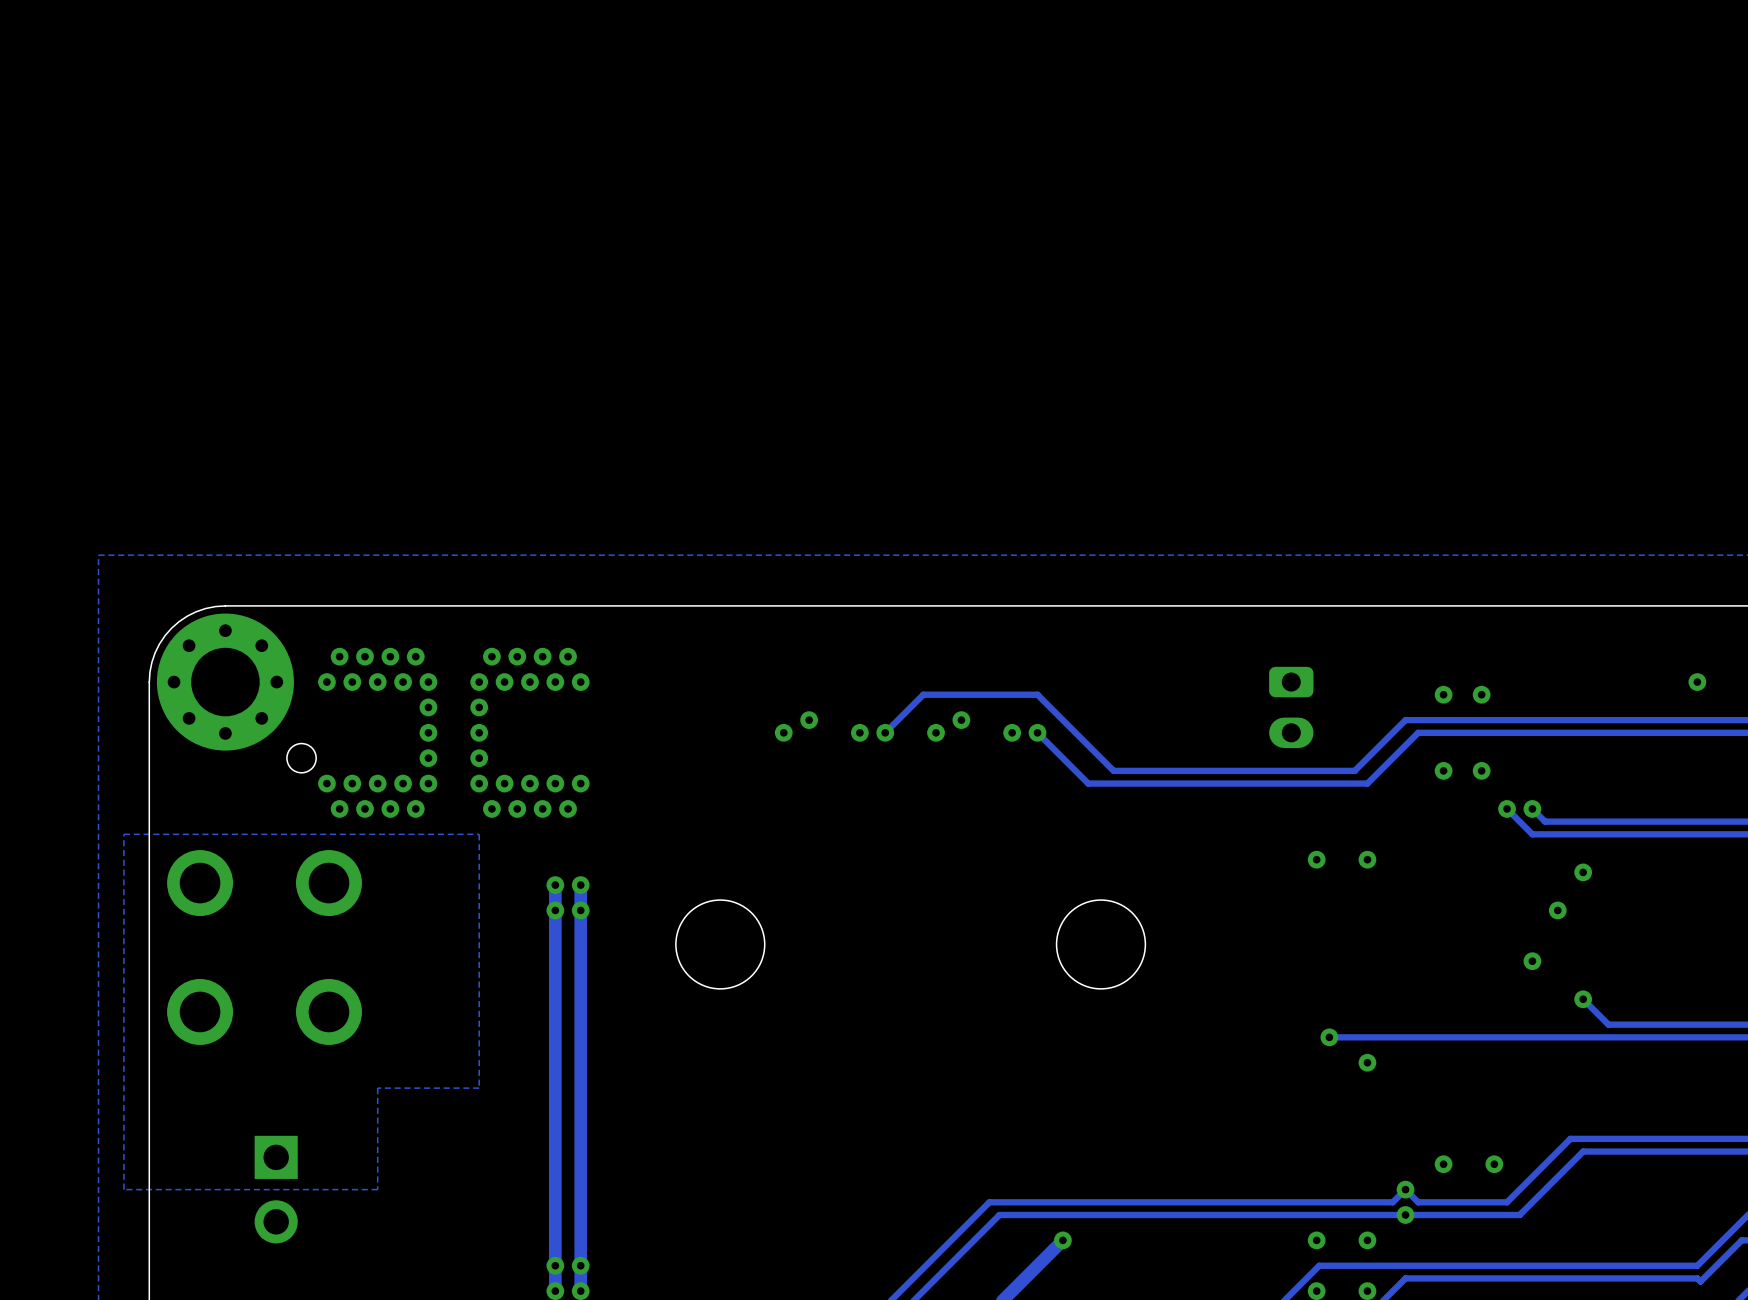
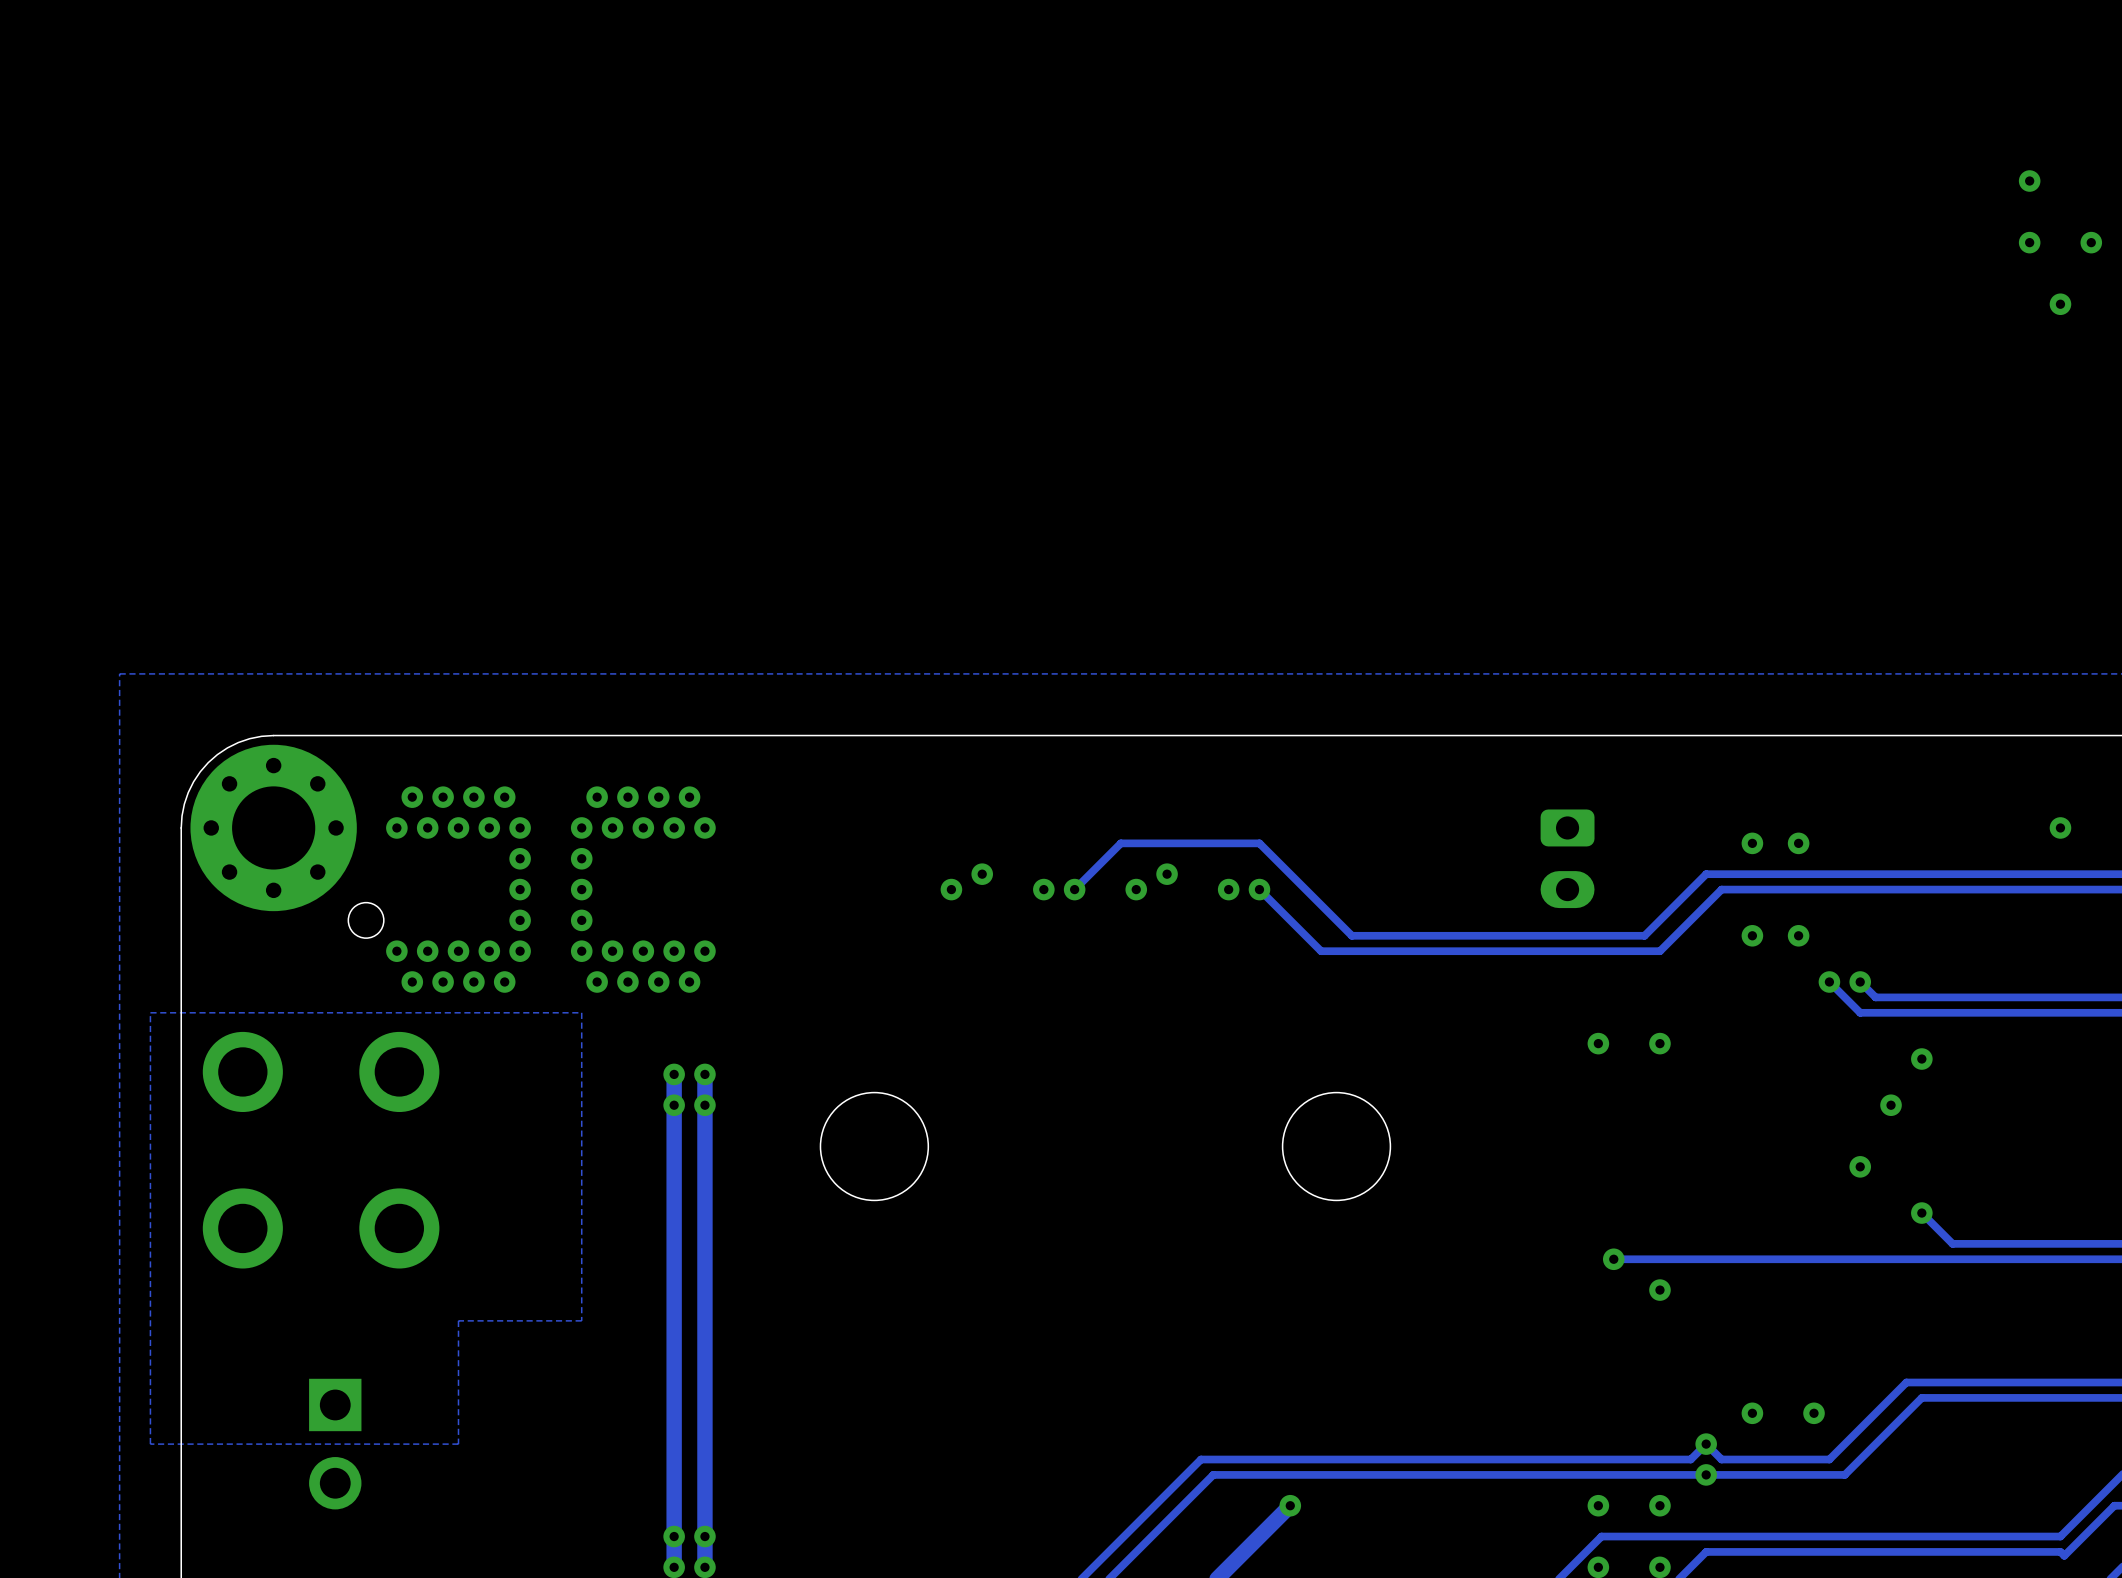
via: none -> (2029, 181)
via: none -> (2029, 242)
via: none -> (2091, 242)
via: none -> (2060, 304)

